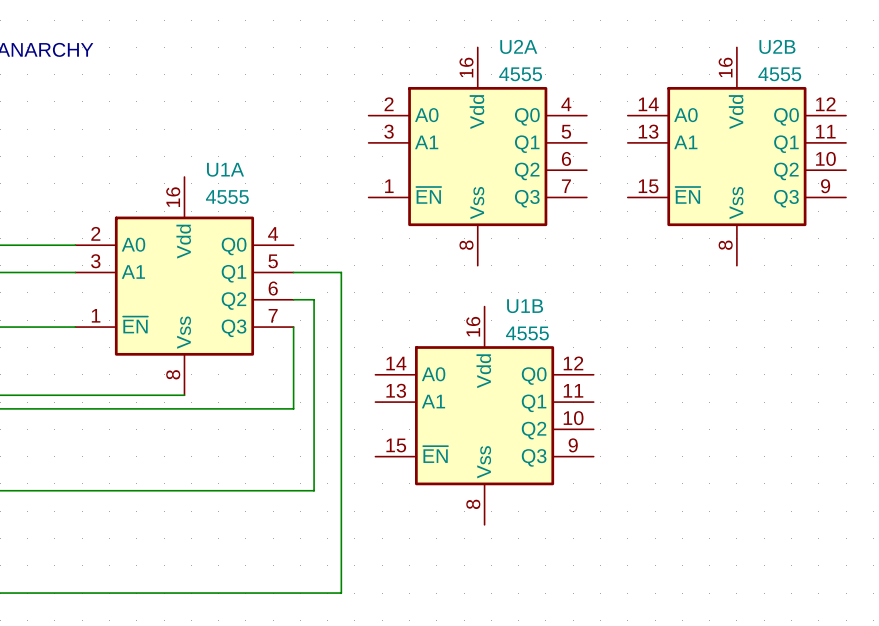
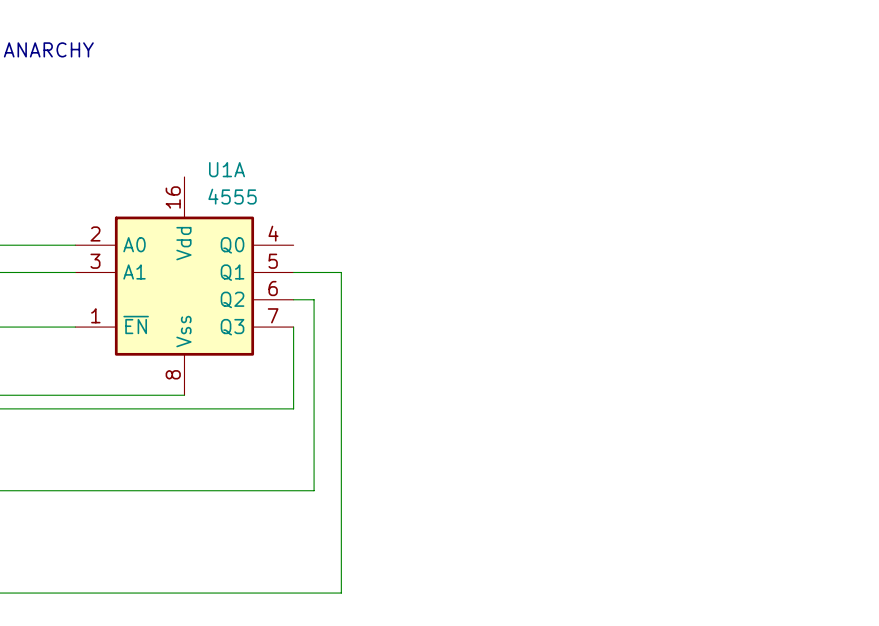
U2A: 4555 (477, 156) -> none
U2B: 4555 (736, 156) -> none
U1B: 4555 (484, 415) -> none

